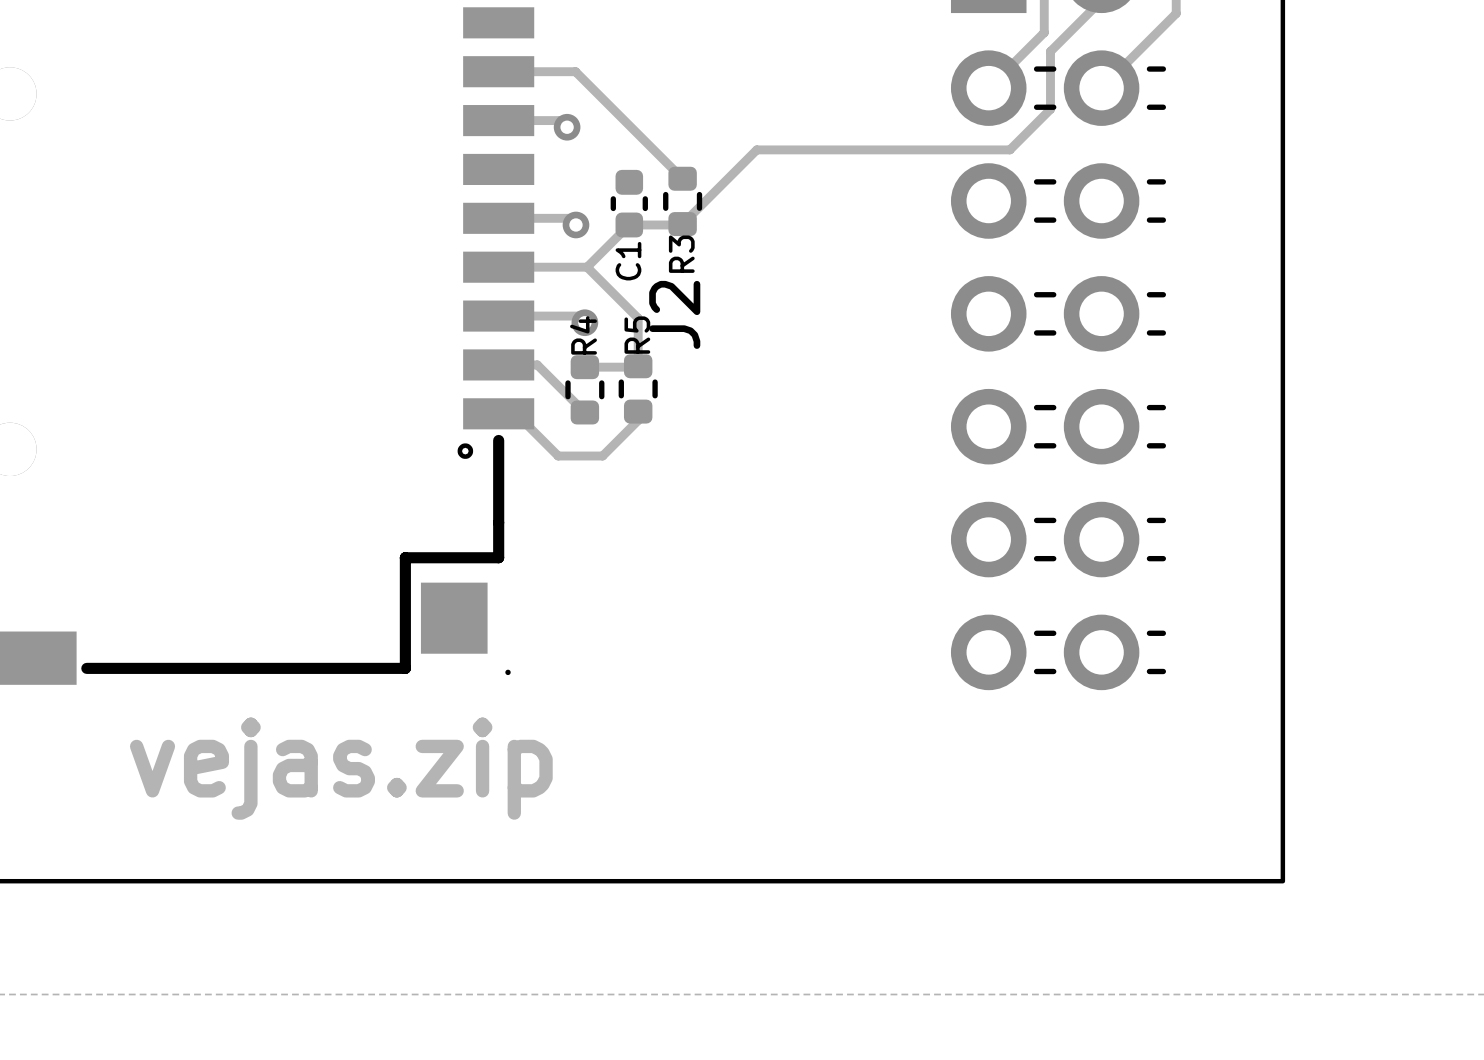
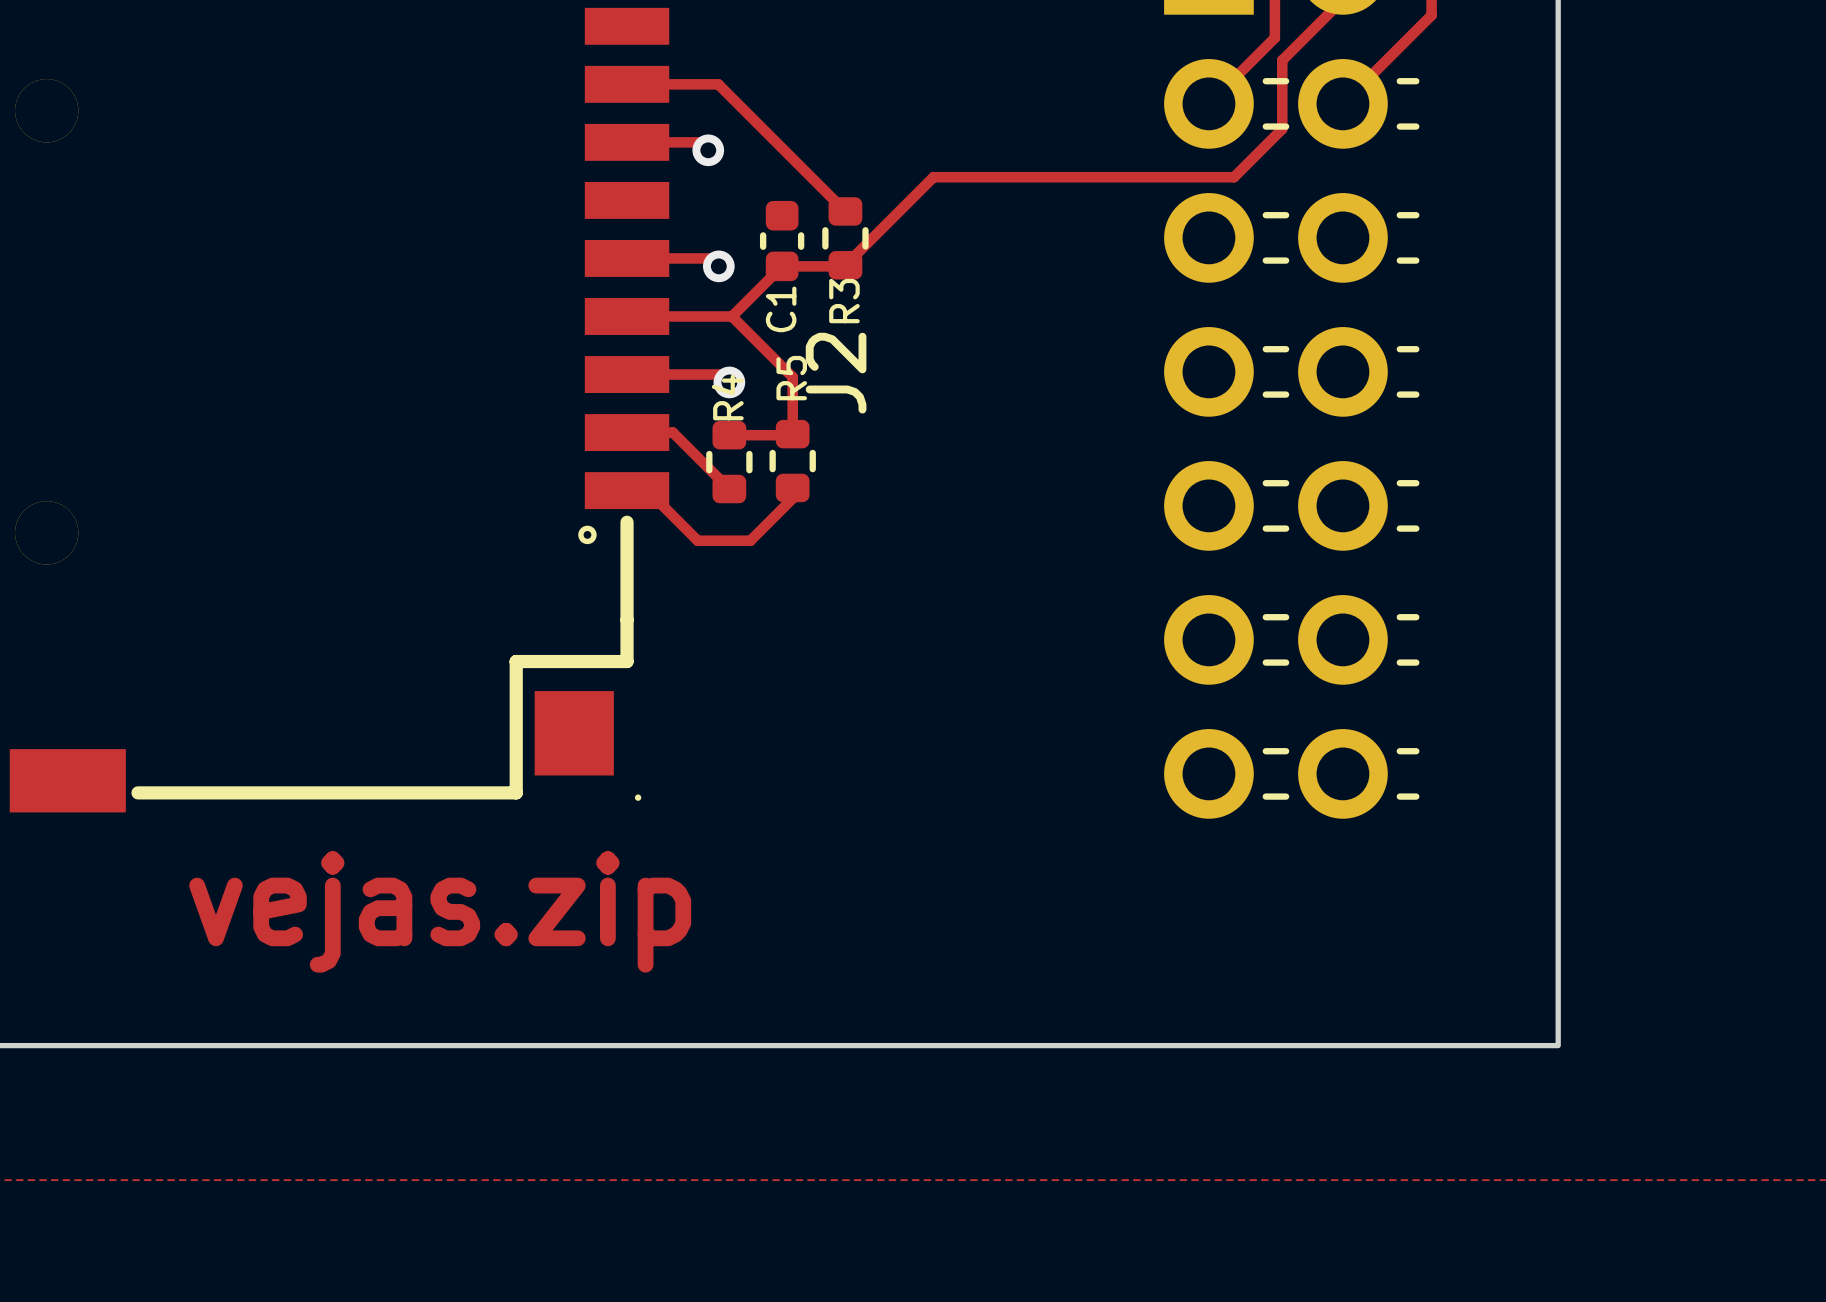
R5 name position: R5 (637, 335) -> R5 (791, 378)

